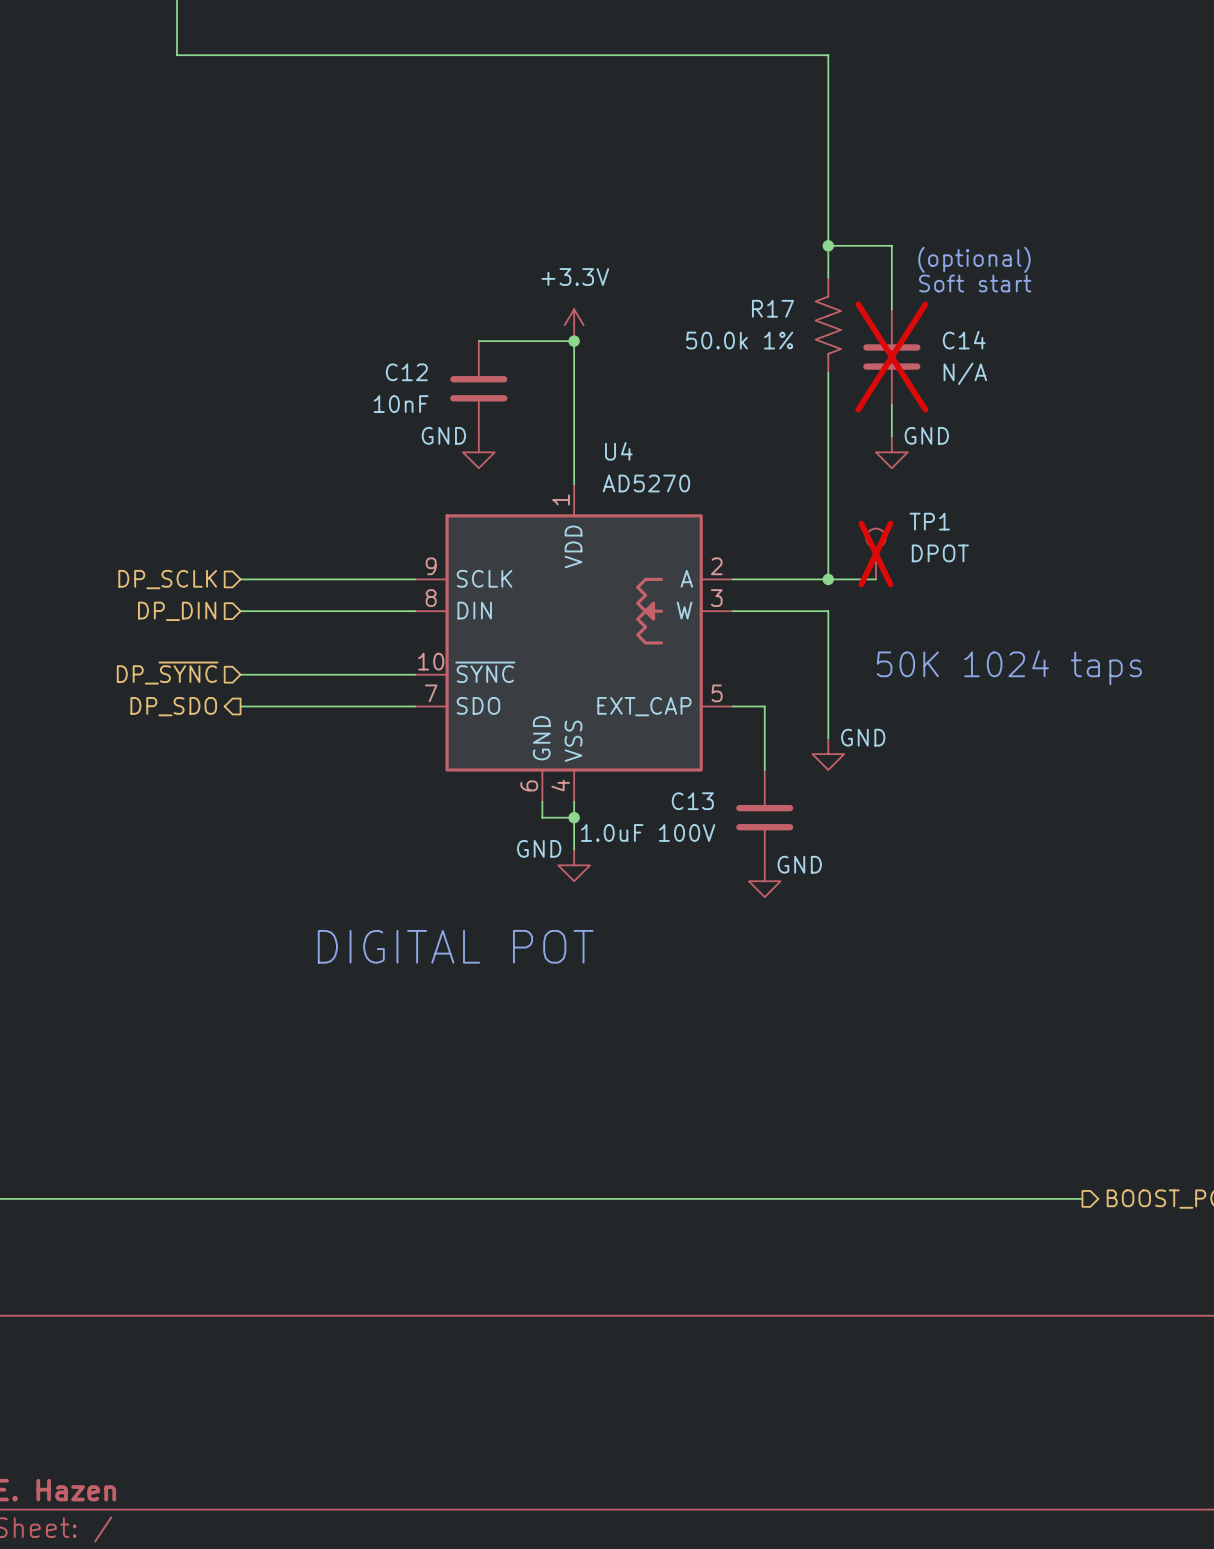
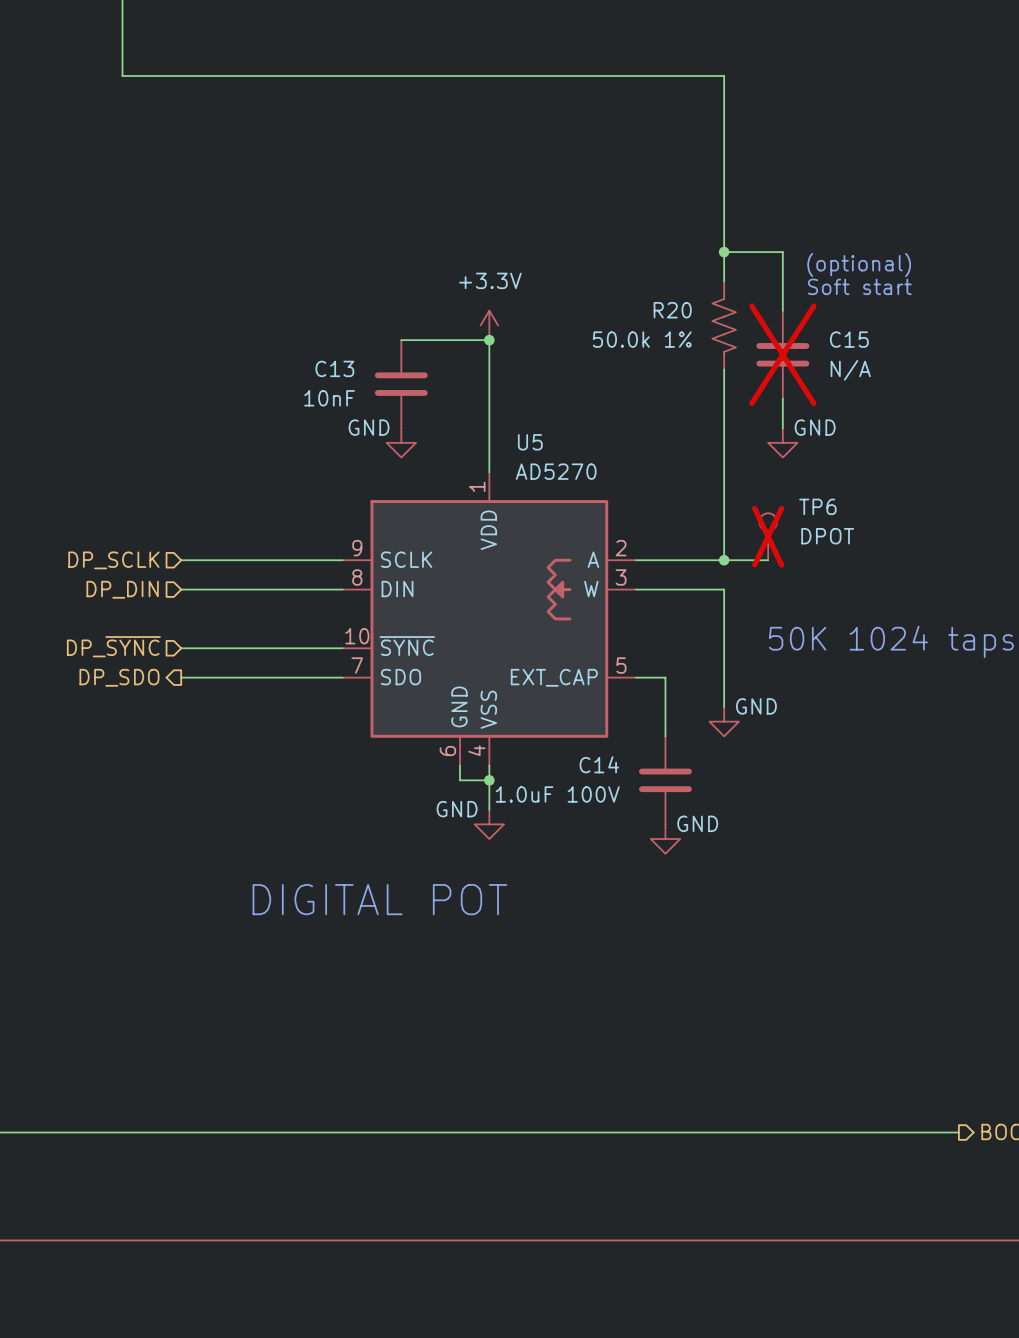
R17 name: R17 (772, 308) -> R20 (672, 310)
C14 name: C14 (964, 340) -> C15 (849, 339)
C12 name: C12 (406, 372) -> C13 (334, 368)
U4 name: U4 (618, 451) -> U5 (530, 442)
TP1 name: TP1 (929, 521) -> TP6 (817, 506)
C13 name: C13 (692, 801) -> C14 (599, 764)

